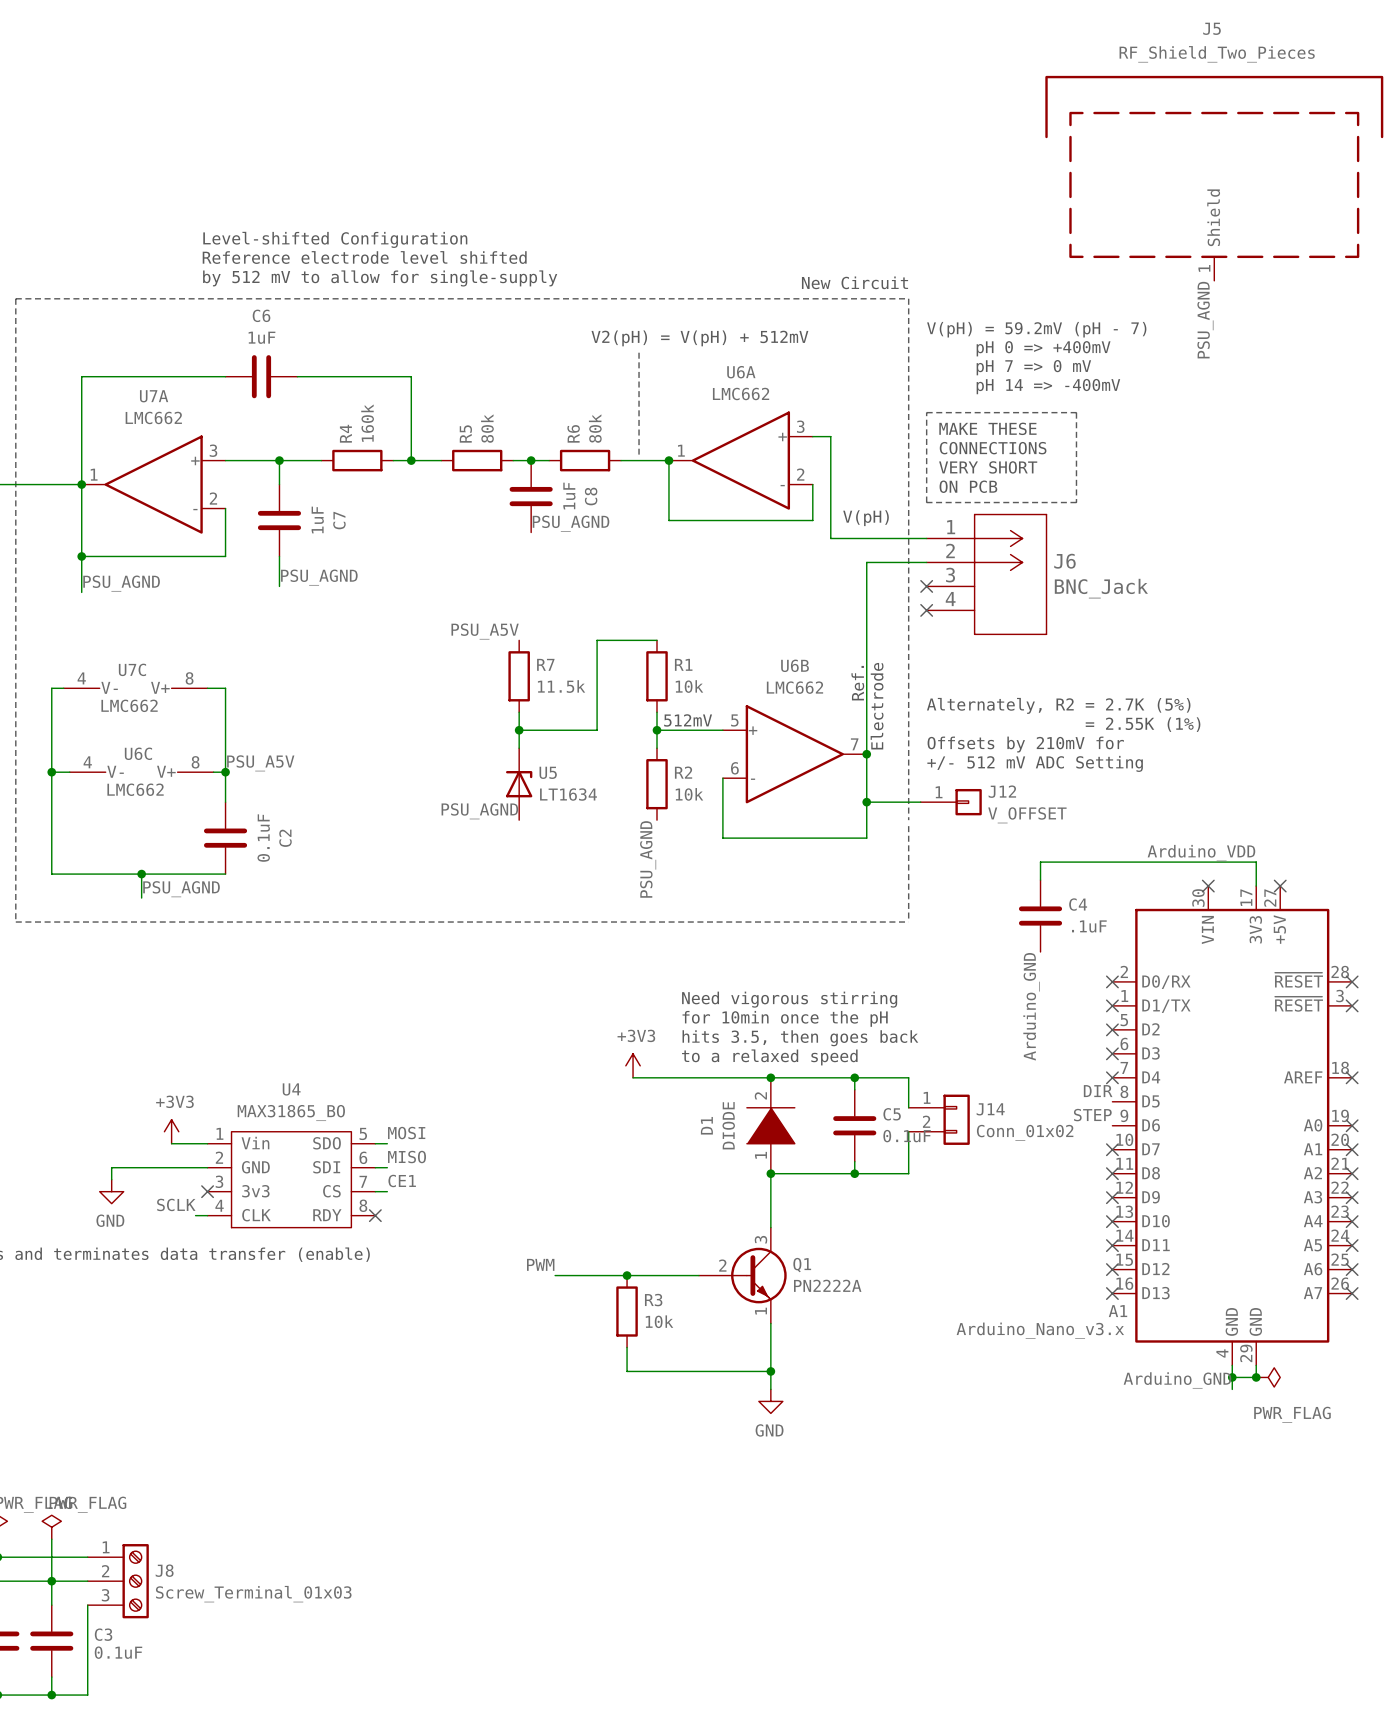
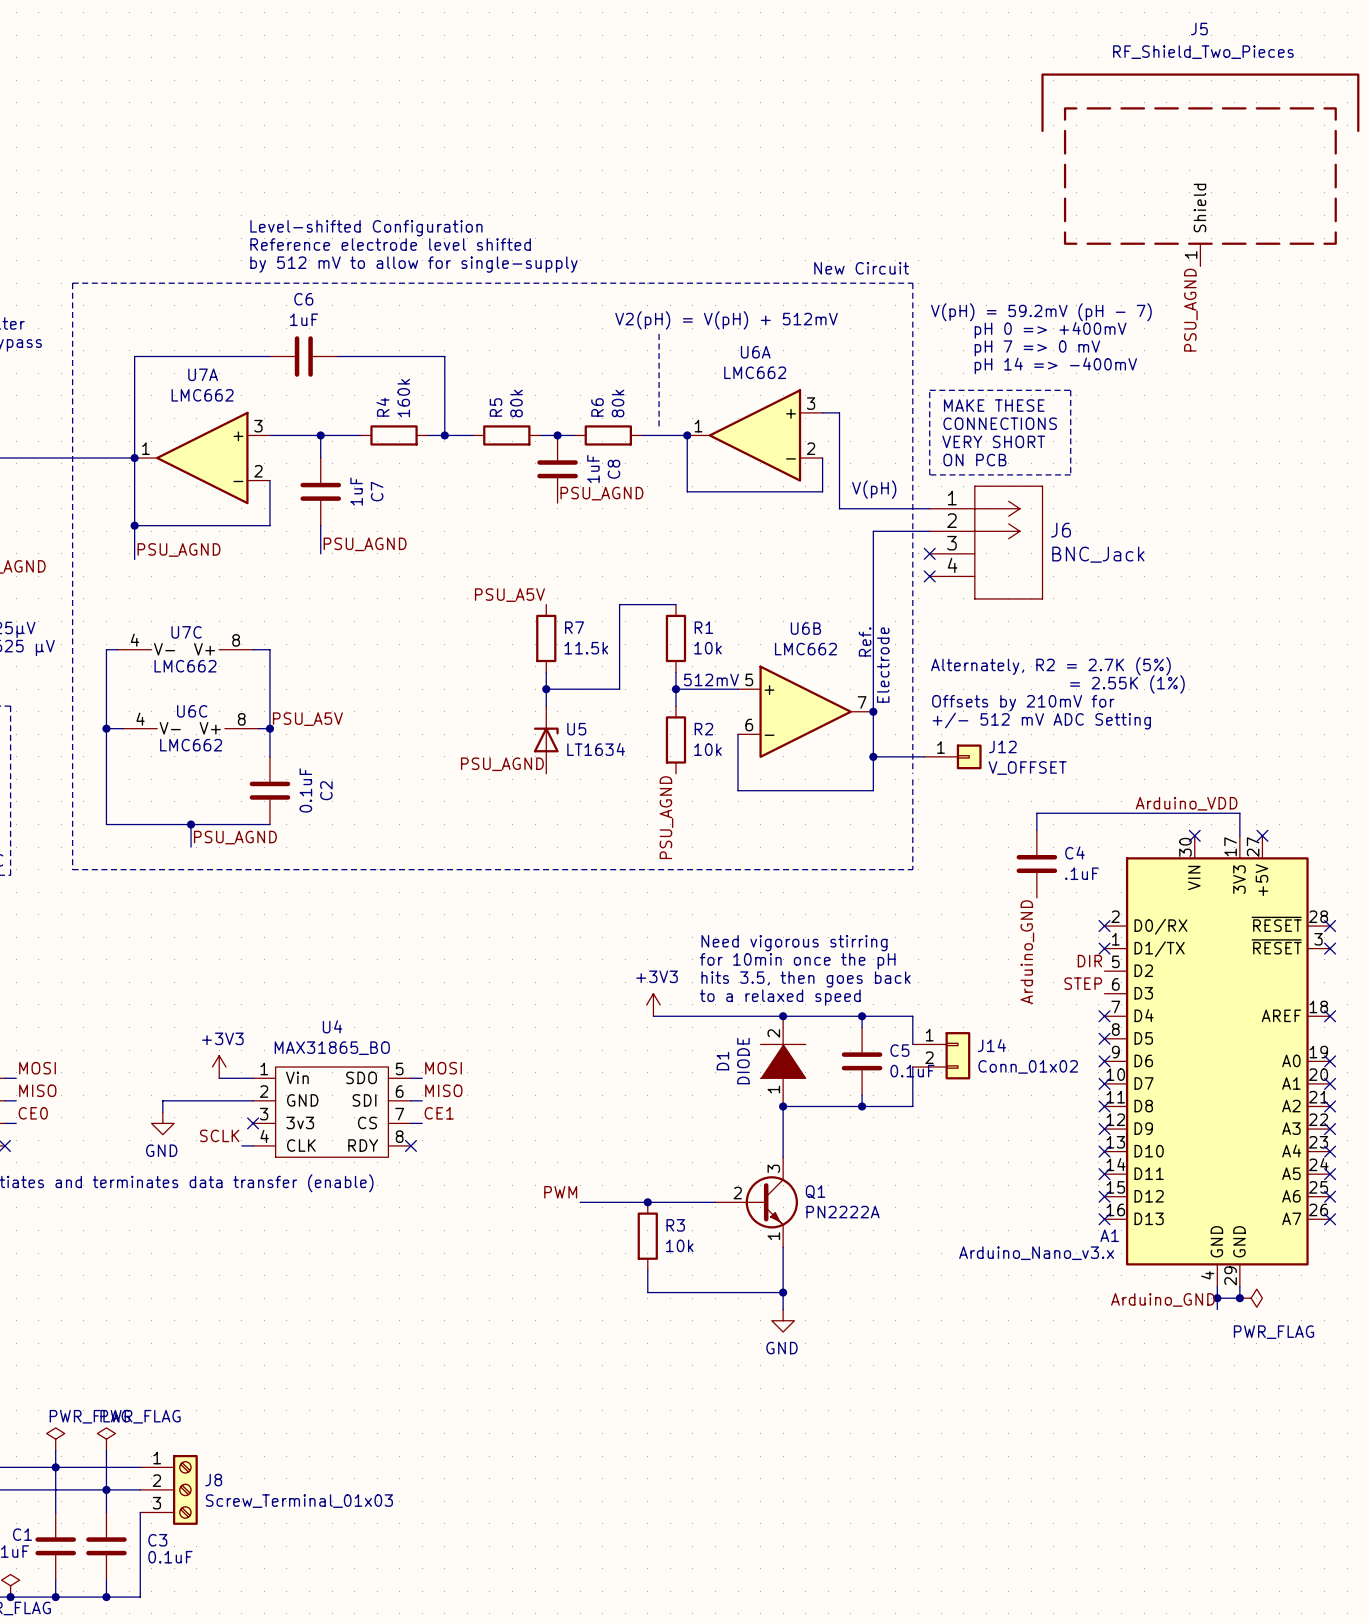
no-connect mark: (1112, 1029) -> none
no-connect mark: (1112, 1053) -> none
label position: DIR (1098, 1091) -> DIR (1089, 961)
no-connect mark: none -> (1104, 1038)
label position: STEP (1092, 1115) -> STEP (1083, 983)
no-connect mark: none -> (1104, 1061)

